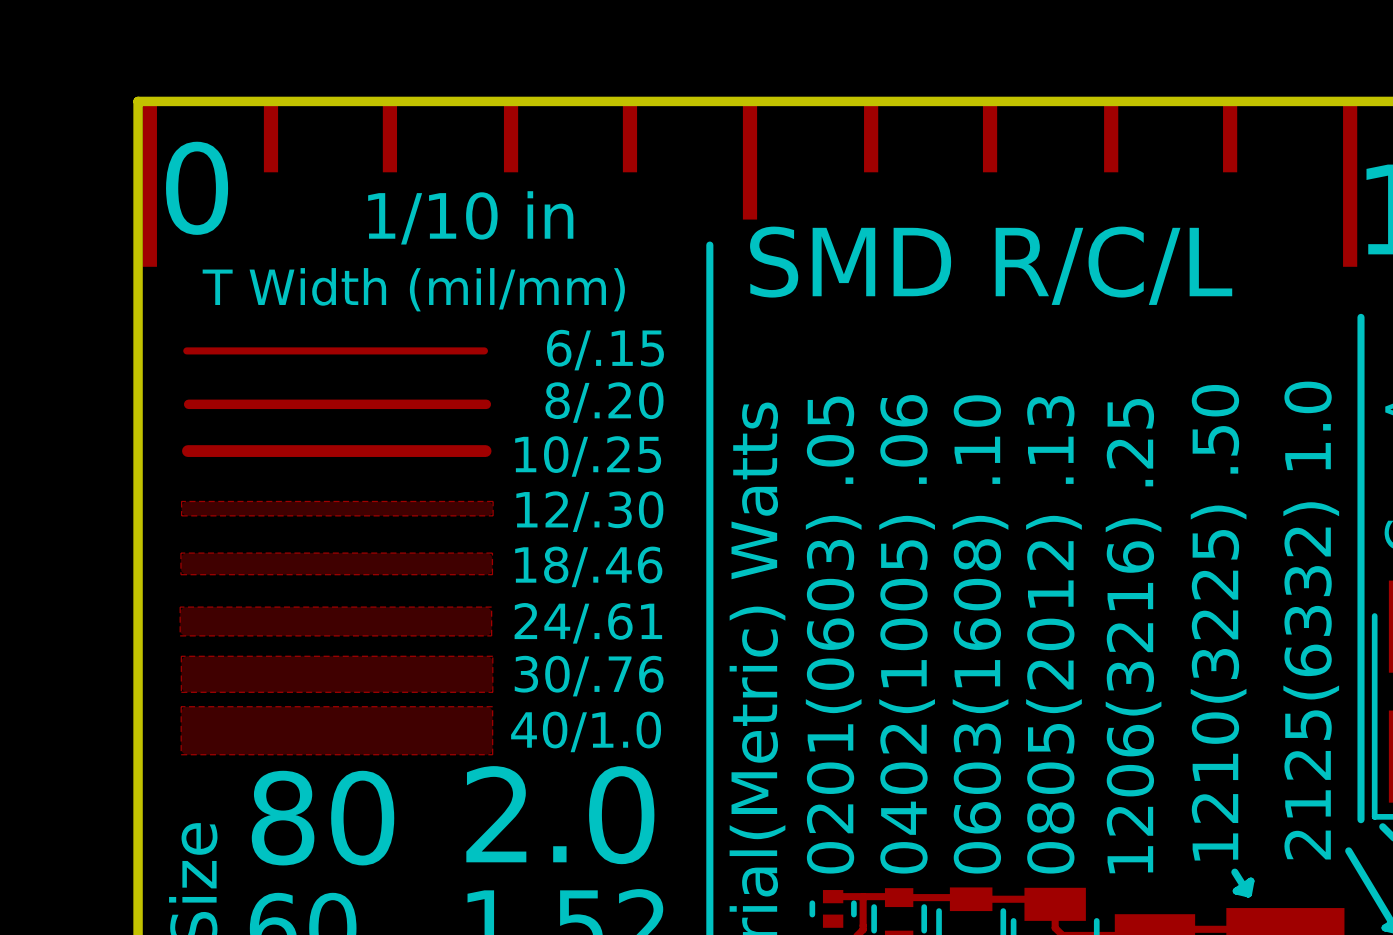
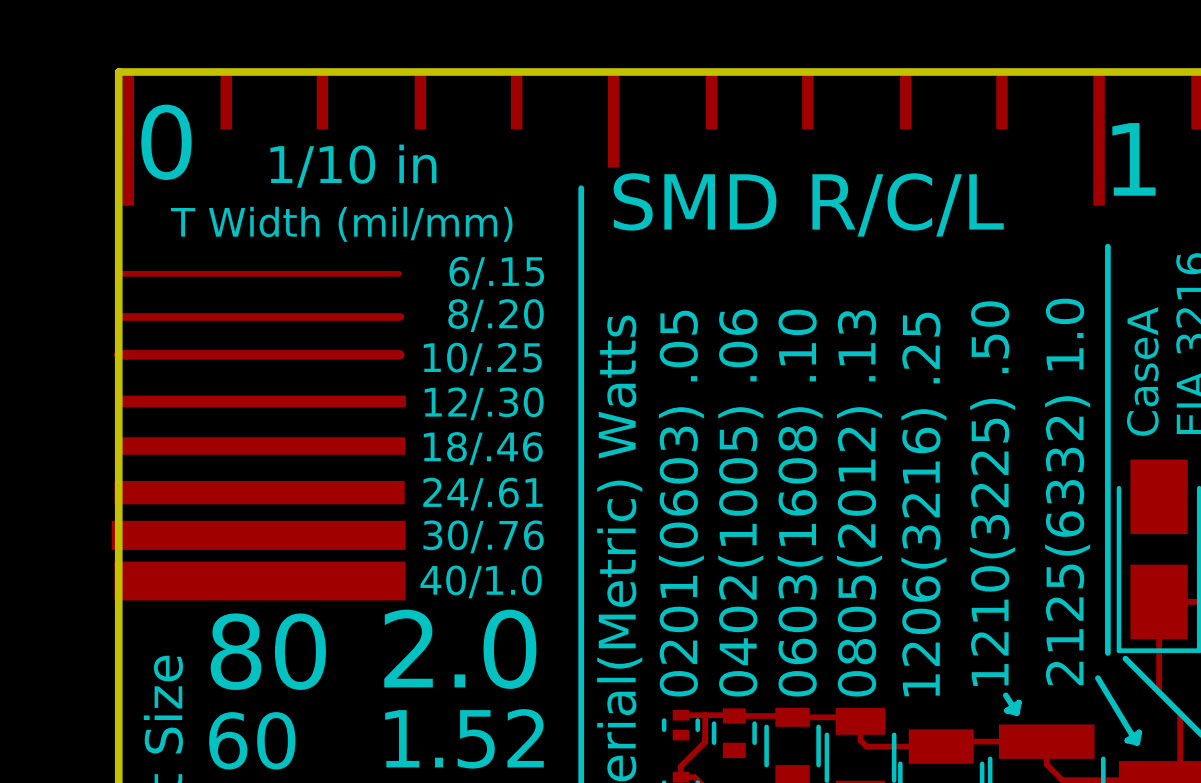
text position: 1/10 in (470, 217) -> 1/10 in (353, 166)
track: none -> (118, 273) (158, 273)
track: none -> (118, 316) (159, 316)
drawing: none -> [111, 395, 406, 601]
zone outline: (181, 501) (493, 501) (493, 515) (181, 515) (181, 501) -> none
zone outline: (180, 553) (492, 553) (492, 574) (180, 574) (180, 553) -> none
zone outline: (180, 607) (491, 607) (491, 635) (180, 635) (180, 607) -> none
zone outline: (181, 656) (181, 692) (492, 692) (492, 656) (181, 656) -> none
zone outline: (181, 706) (181, 754) (492, 754) (492, 706) (181, 706) -> none

